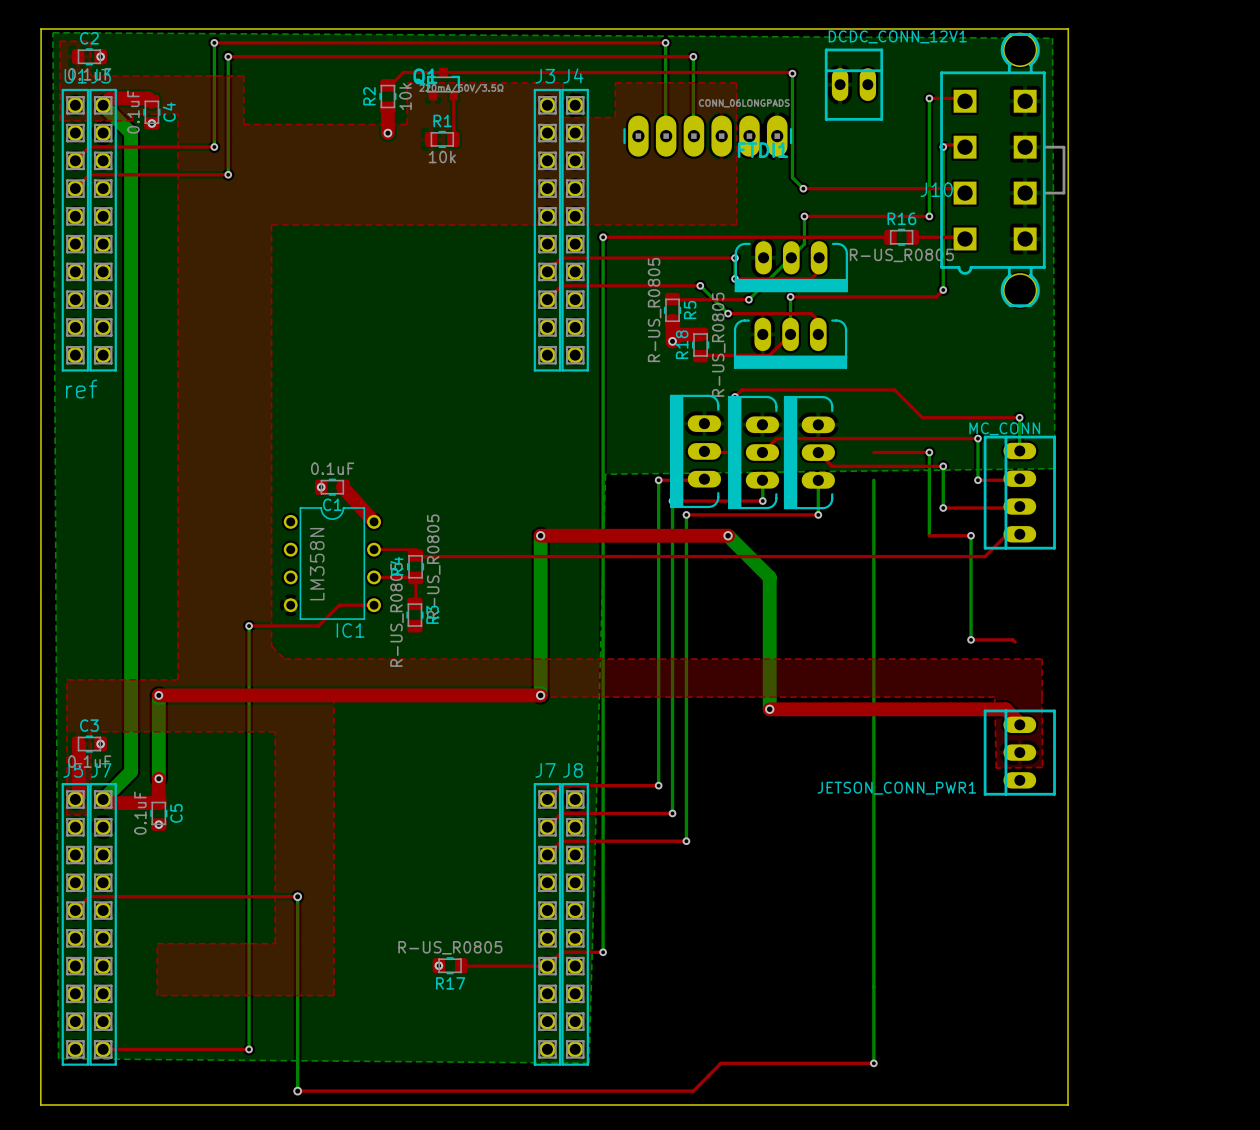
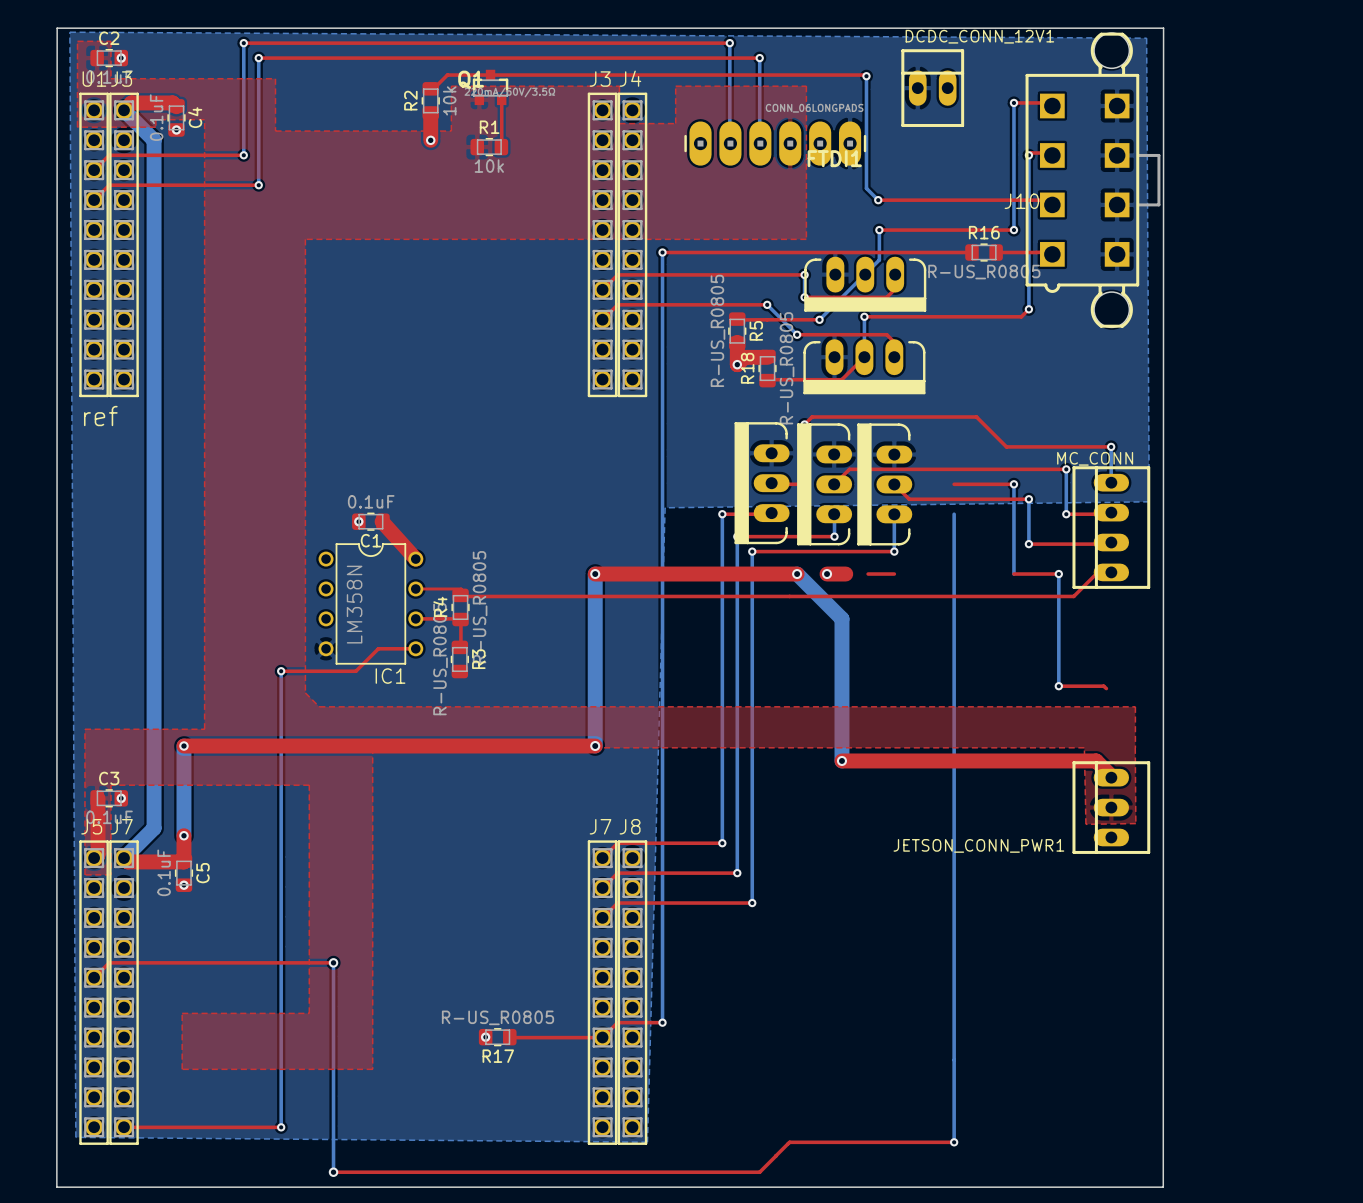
top track: none -> (827, 574) (845, 574)
via: none -> (827, 574)
top track: none -> (868, 574) (894, 574)

